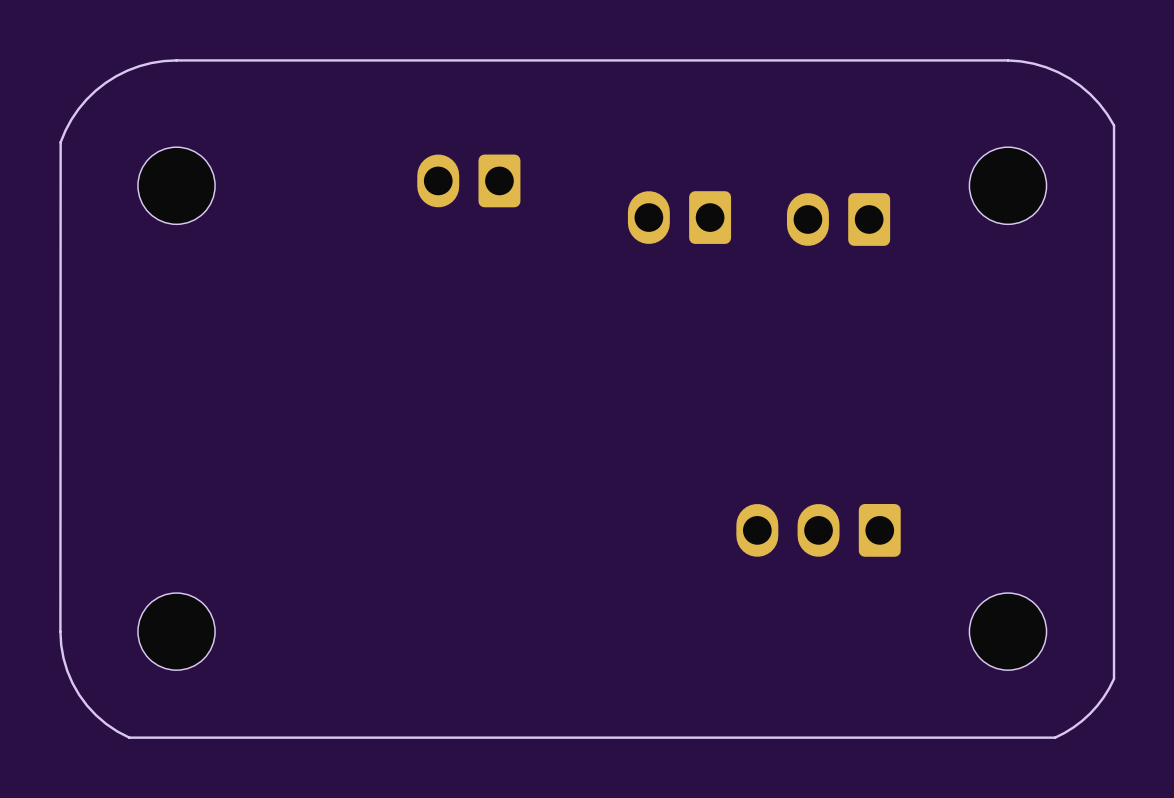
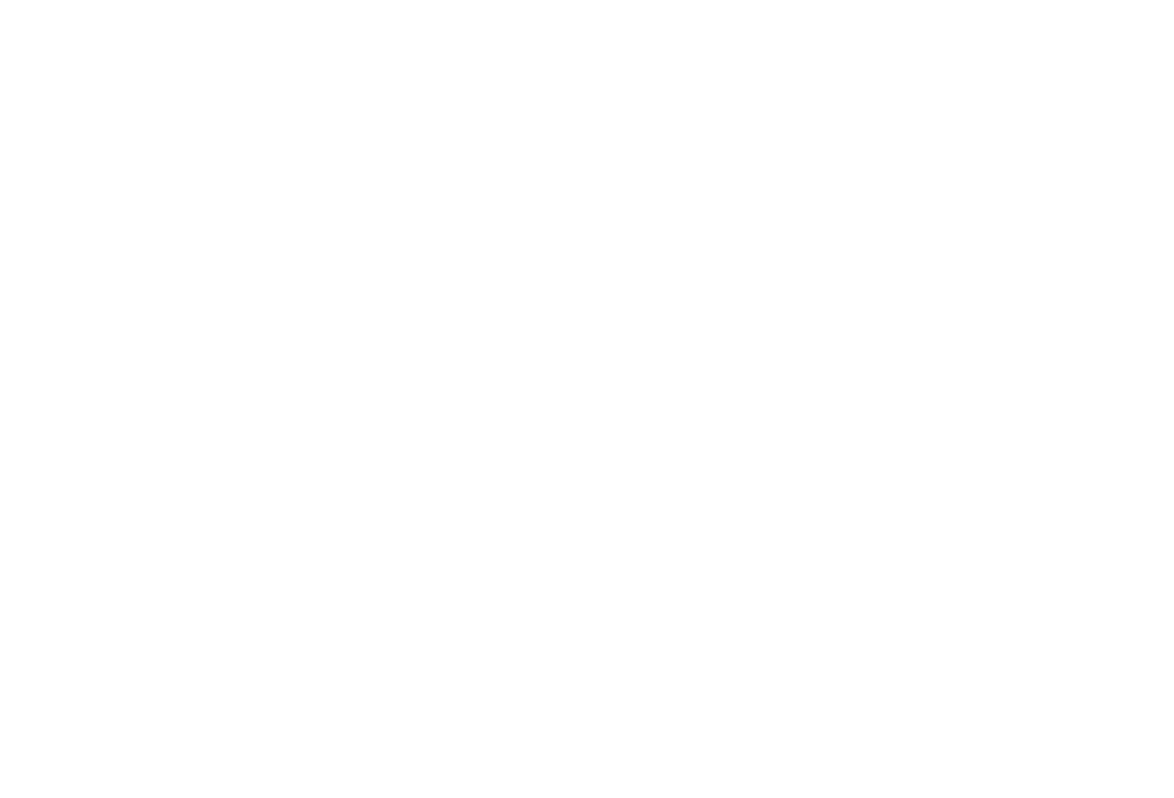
board edge: (1007, 60) (176, 60) (139, 66) (105, 82) (78, 109) (60, 142) (60, 631) (63, 658) (67, 670) (79, 694) (87, 705) (106, 724) (129, 737) (1055, 737) (1073, 727) (1097, 705) (1114, 678) (1114, 125) (1099, 103) (1069, 78) (1033, 63) (1007, 60) -> none
part: (468, 180) -> none
part: (176, 185) -> none
part: (1007, 185) -> none
part: (679, 217) -> none
part: (838, 219) -> none
part: (818, 530) -> none
part: (176, 631) -> none
part: (1007, 631) -> none

